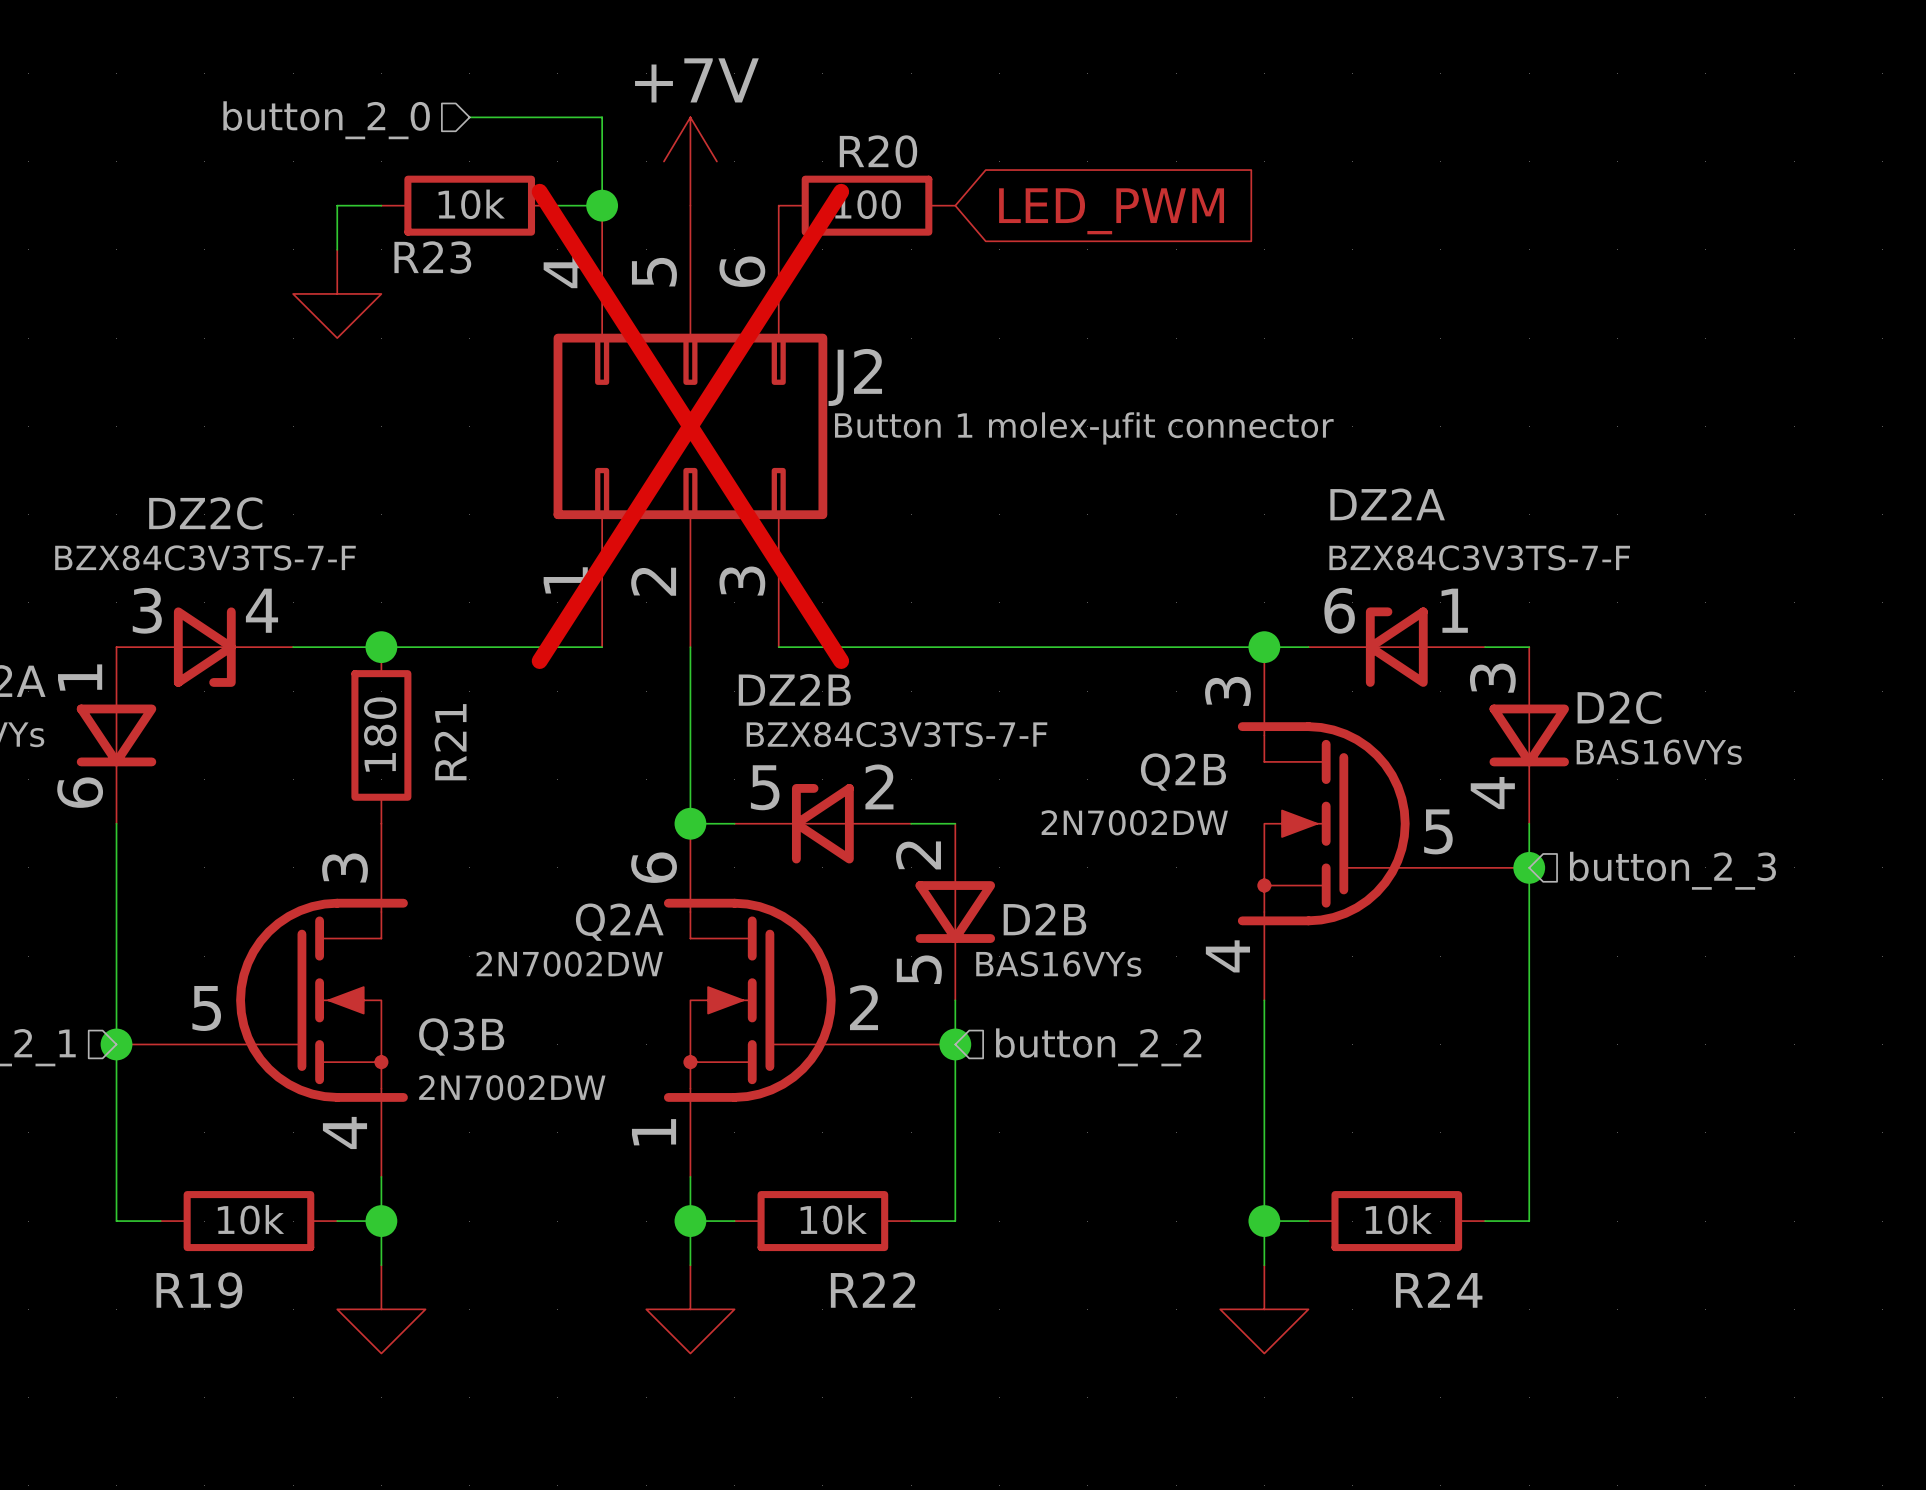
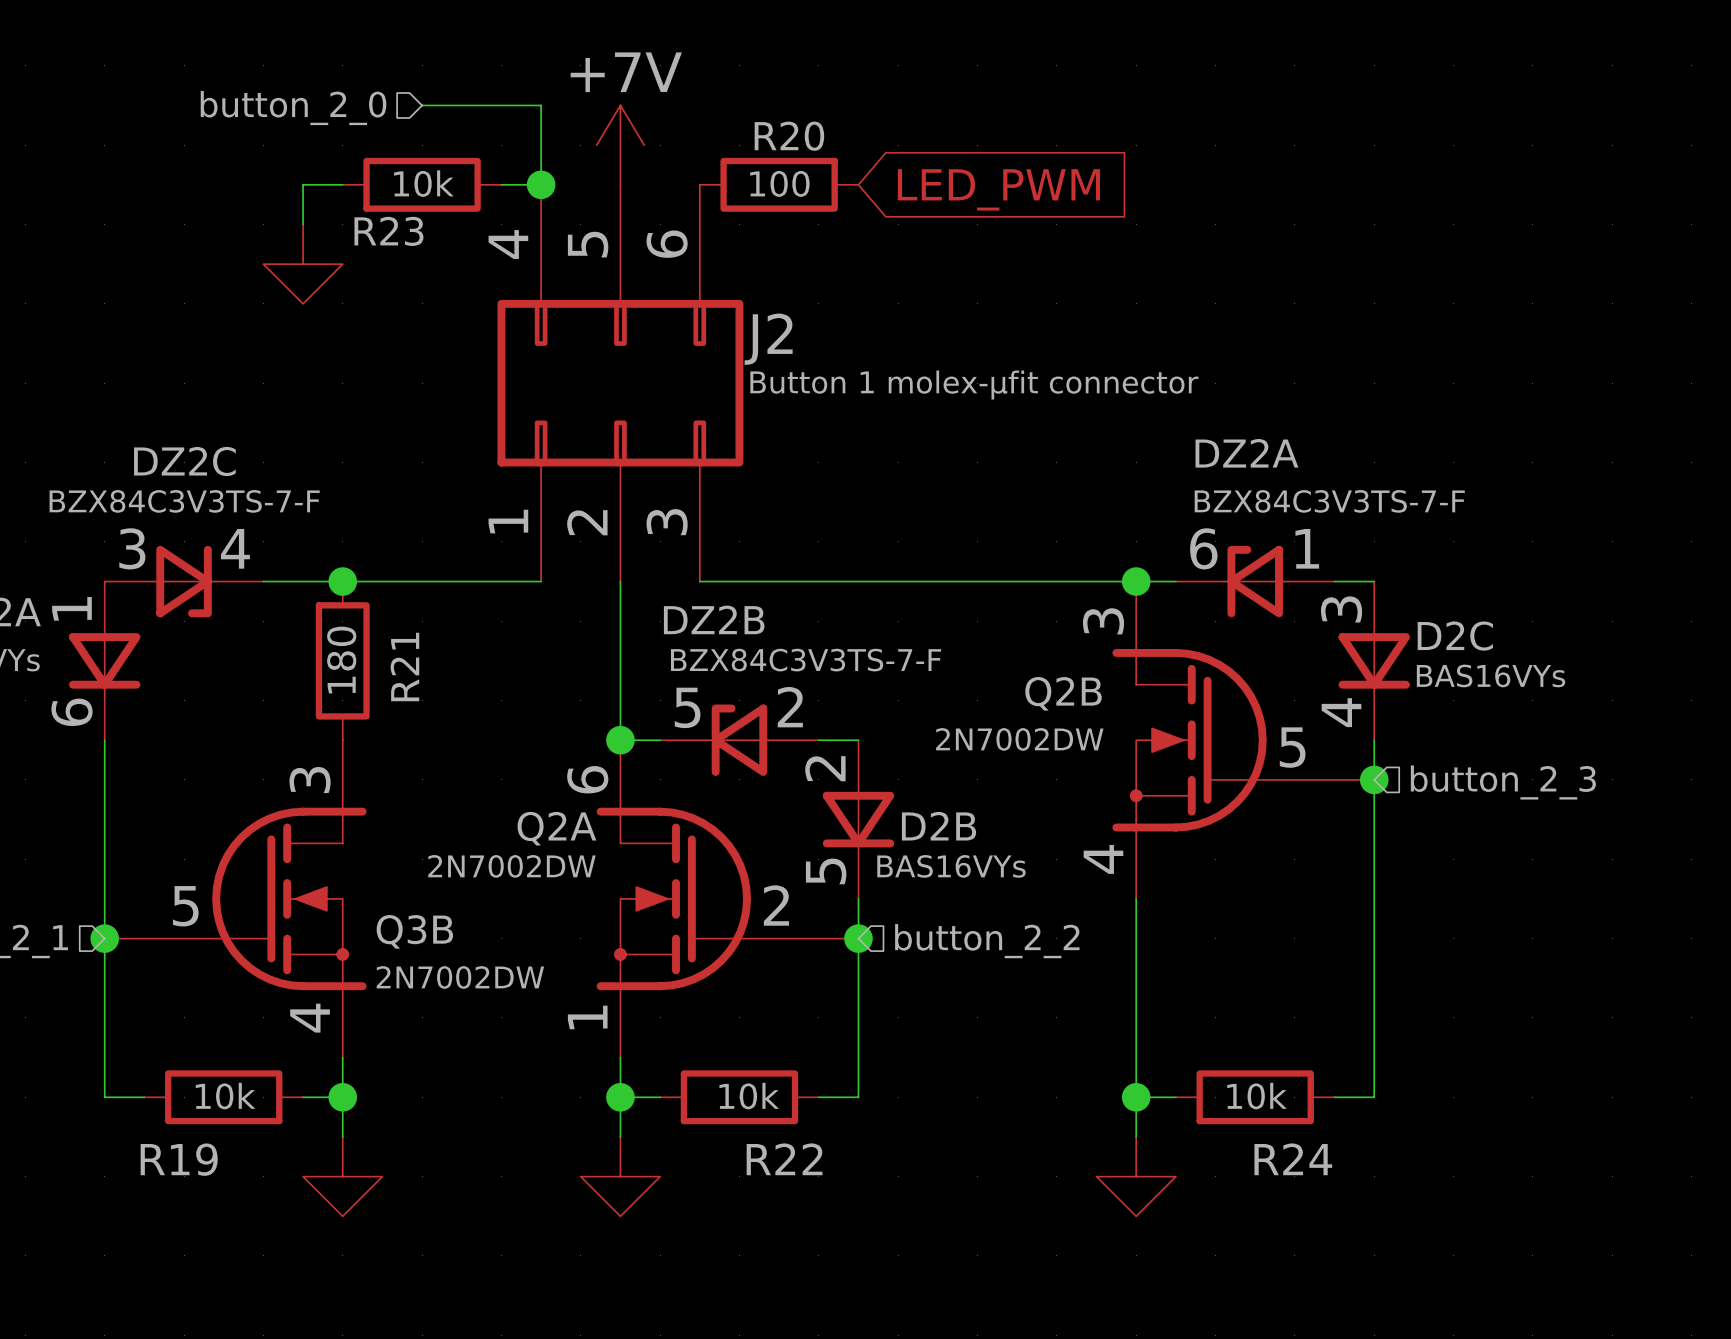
J2 do-not-place cross: (690, 426) -> none

